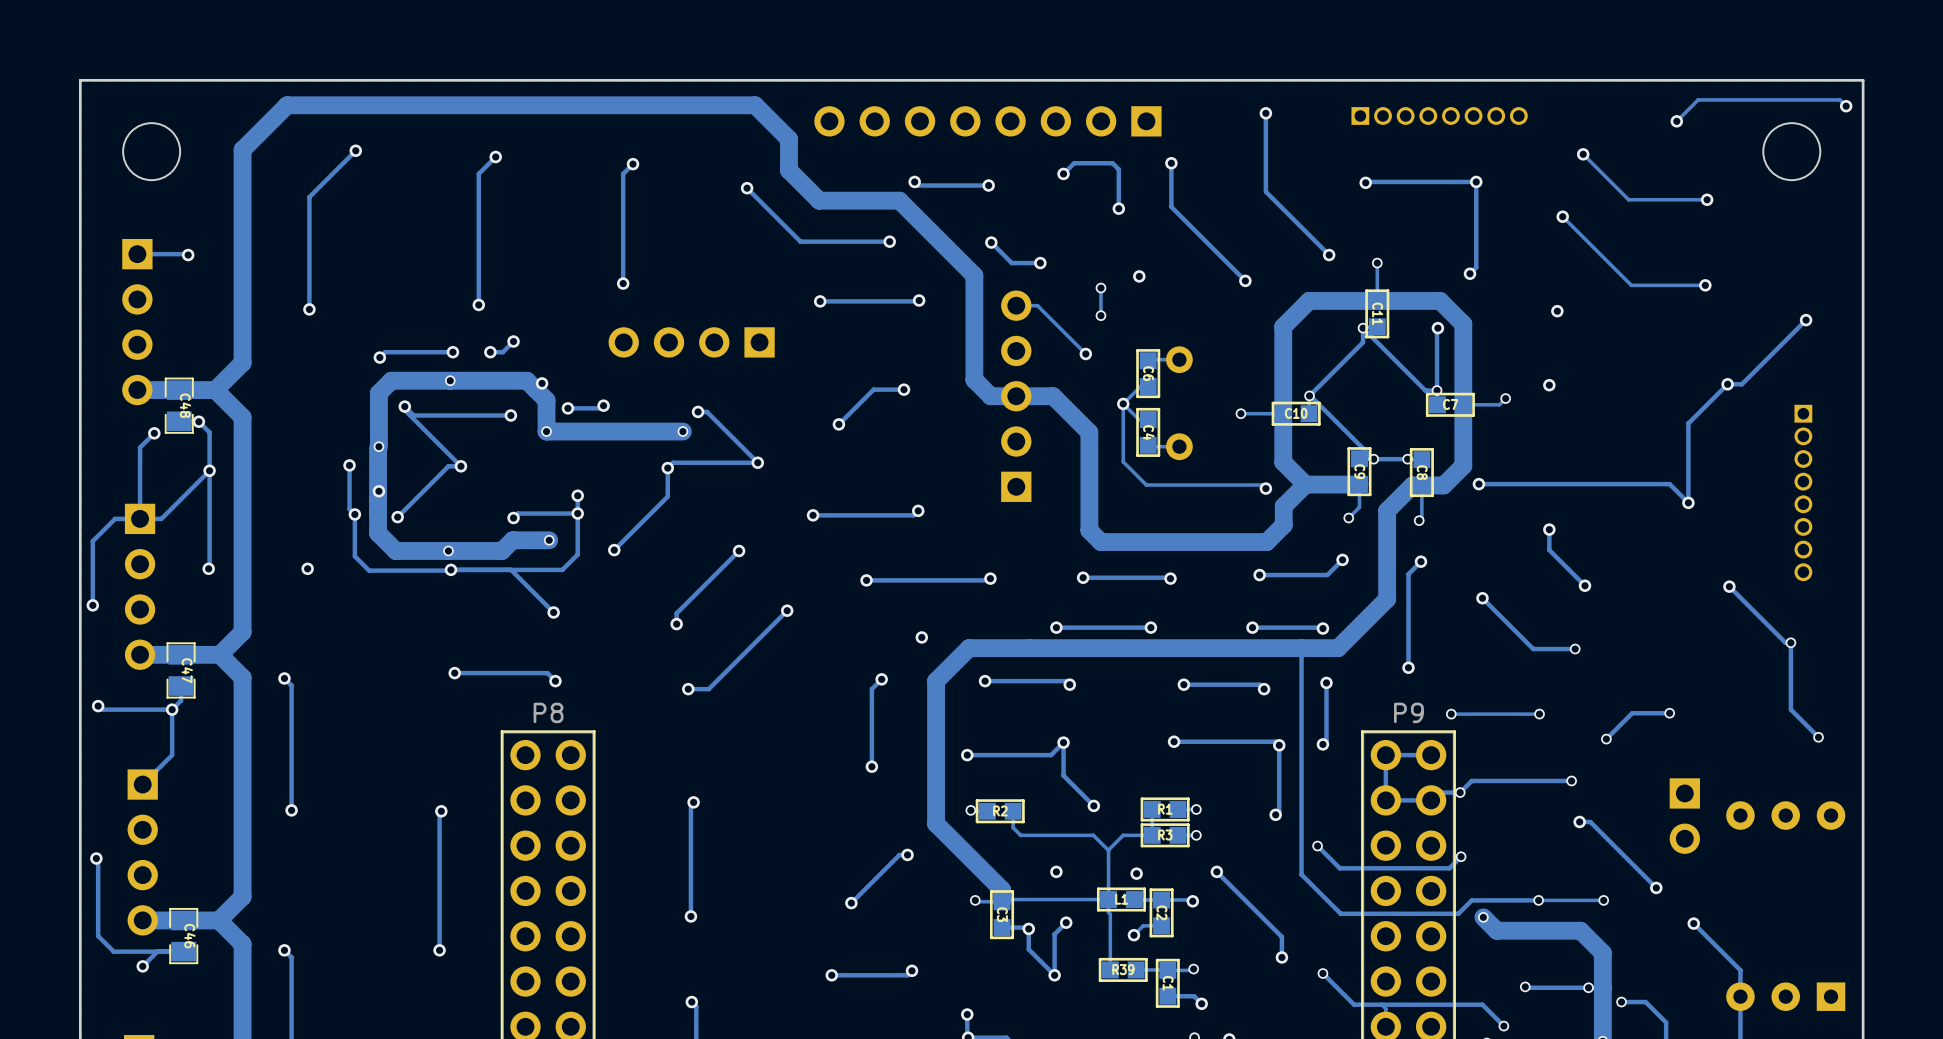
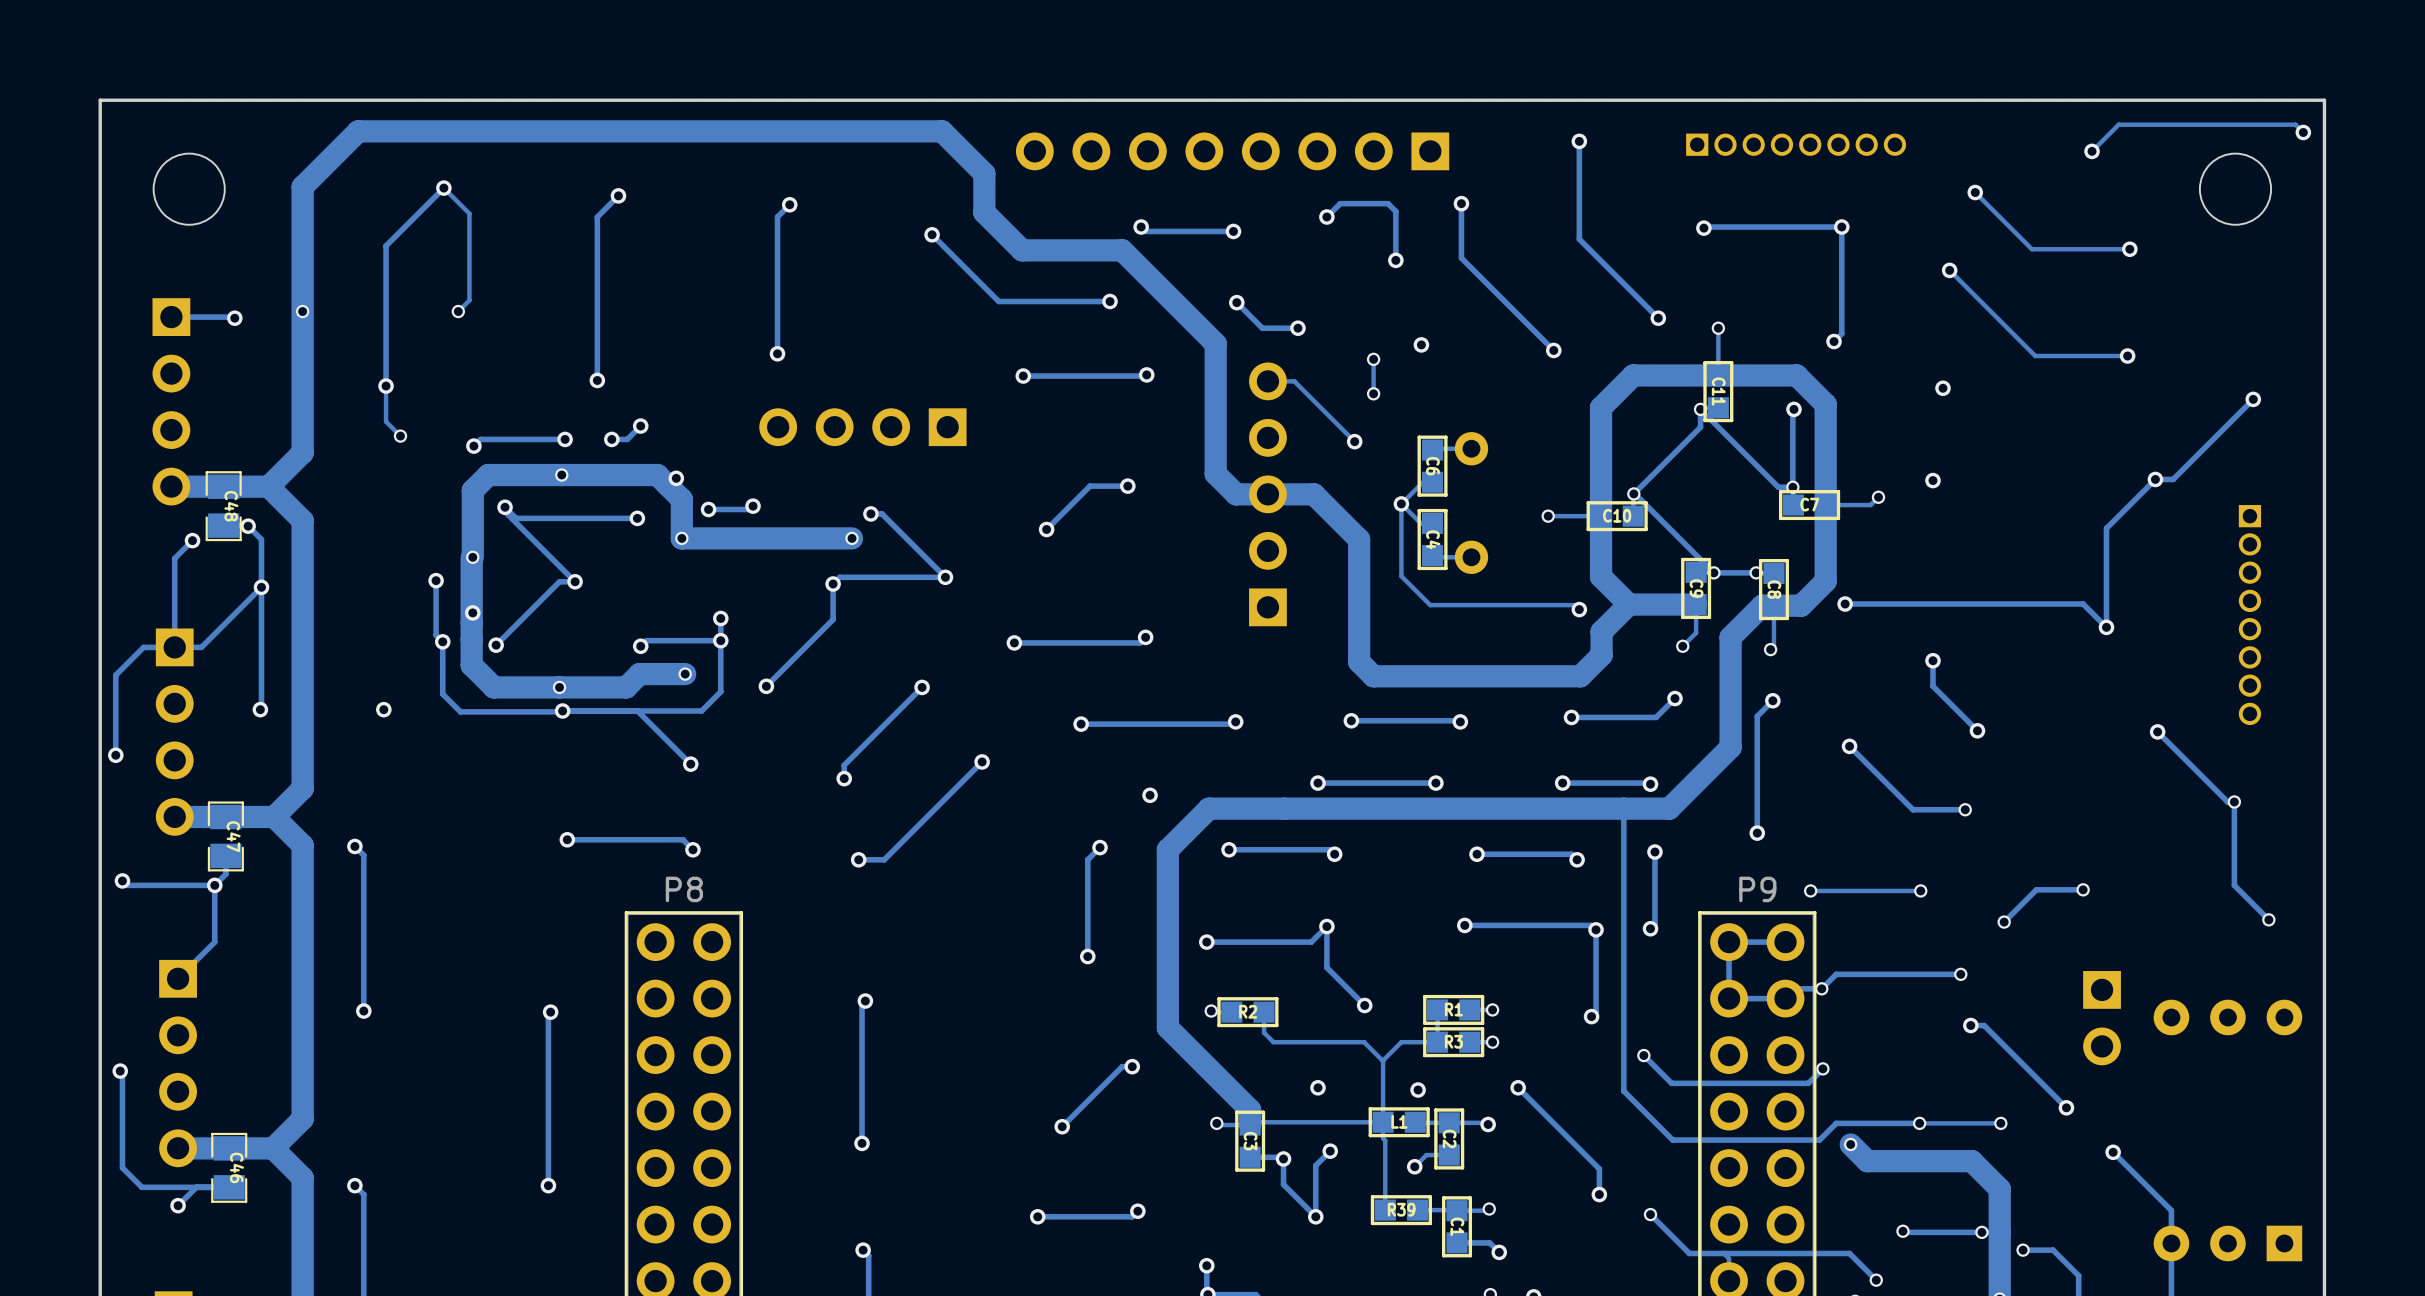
track: none -> (443, 188) (469, 213) (469, 300) (458, 311)
via: none -> (302, 311)
via: none -> (458, 311)
track: none -> (386, 386) (386, 421) (400, 436)
via: none -> (400, 436)

